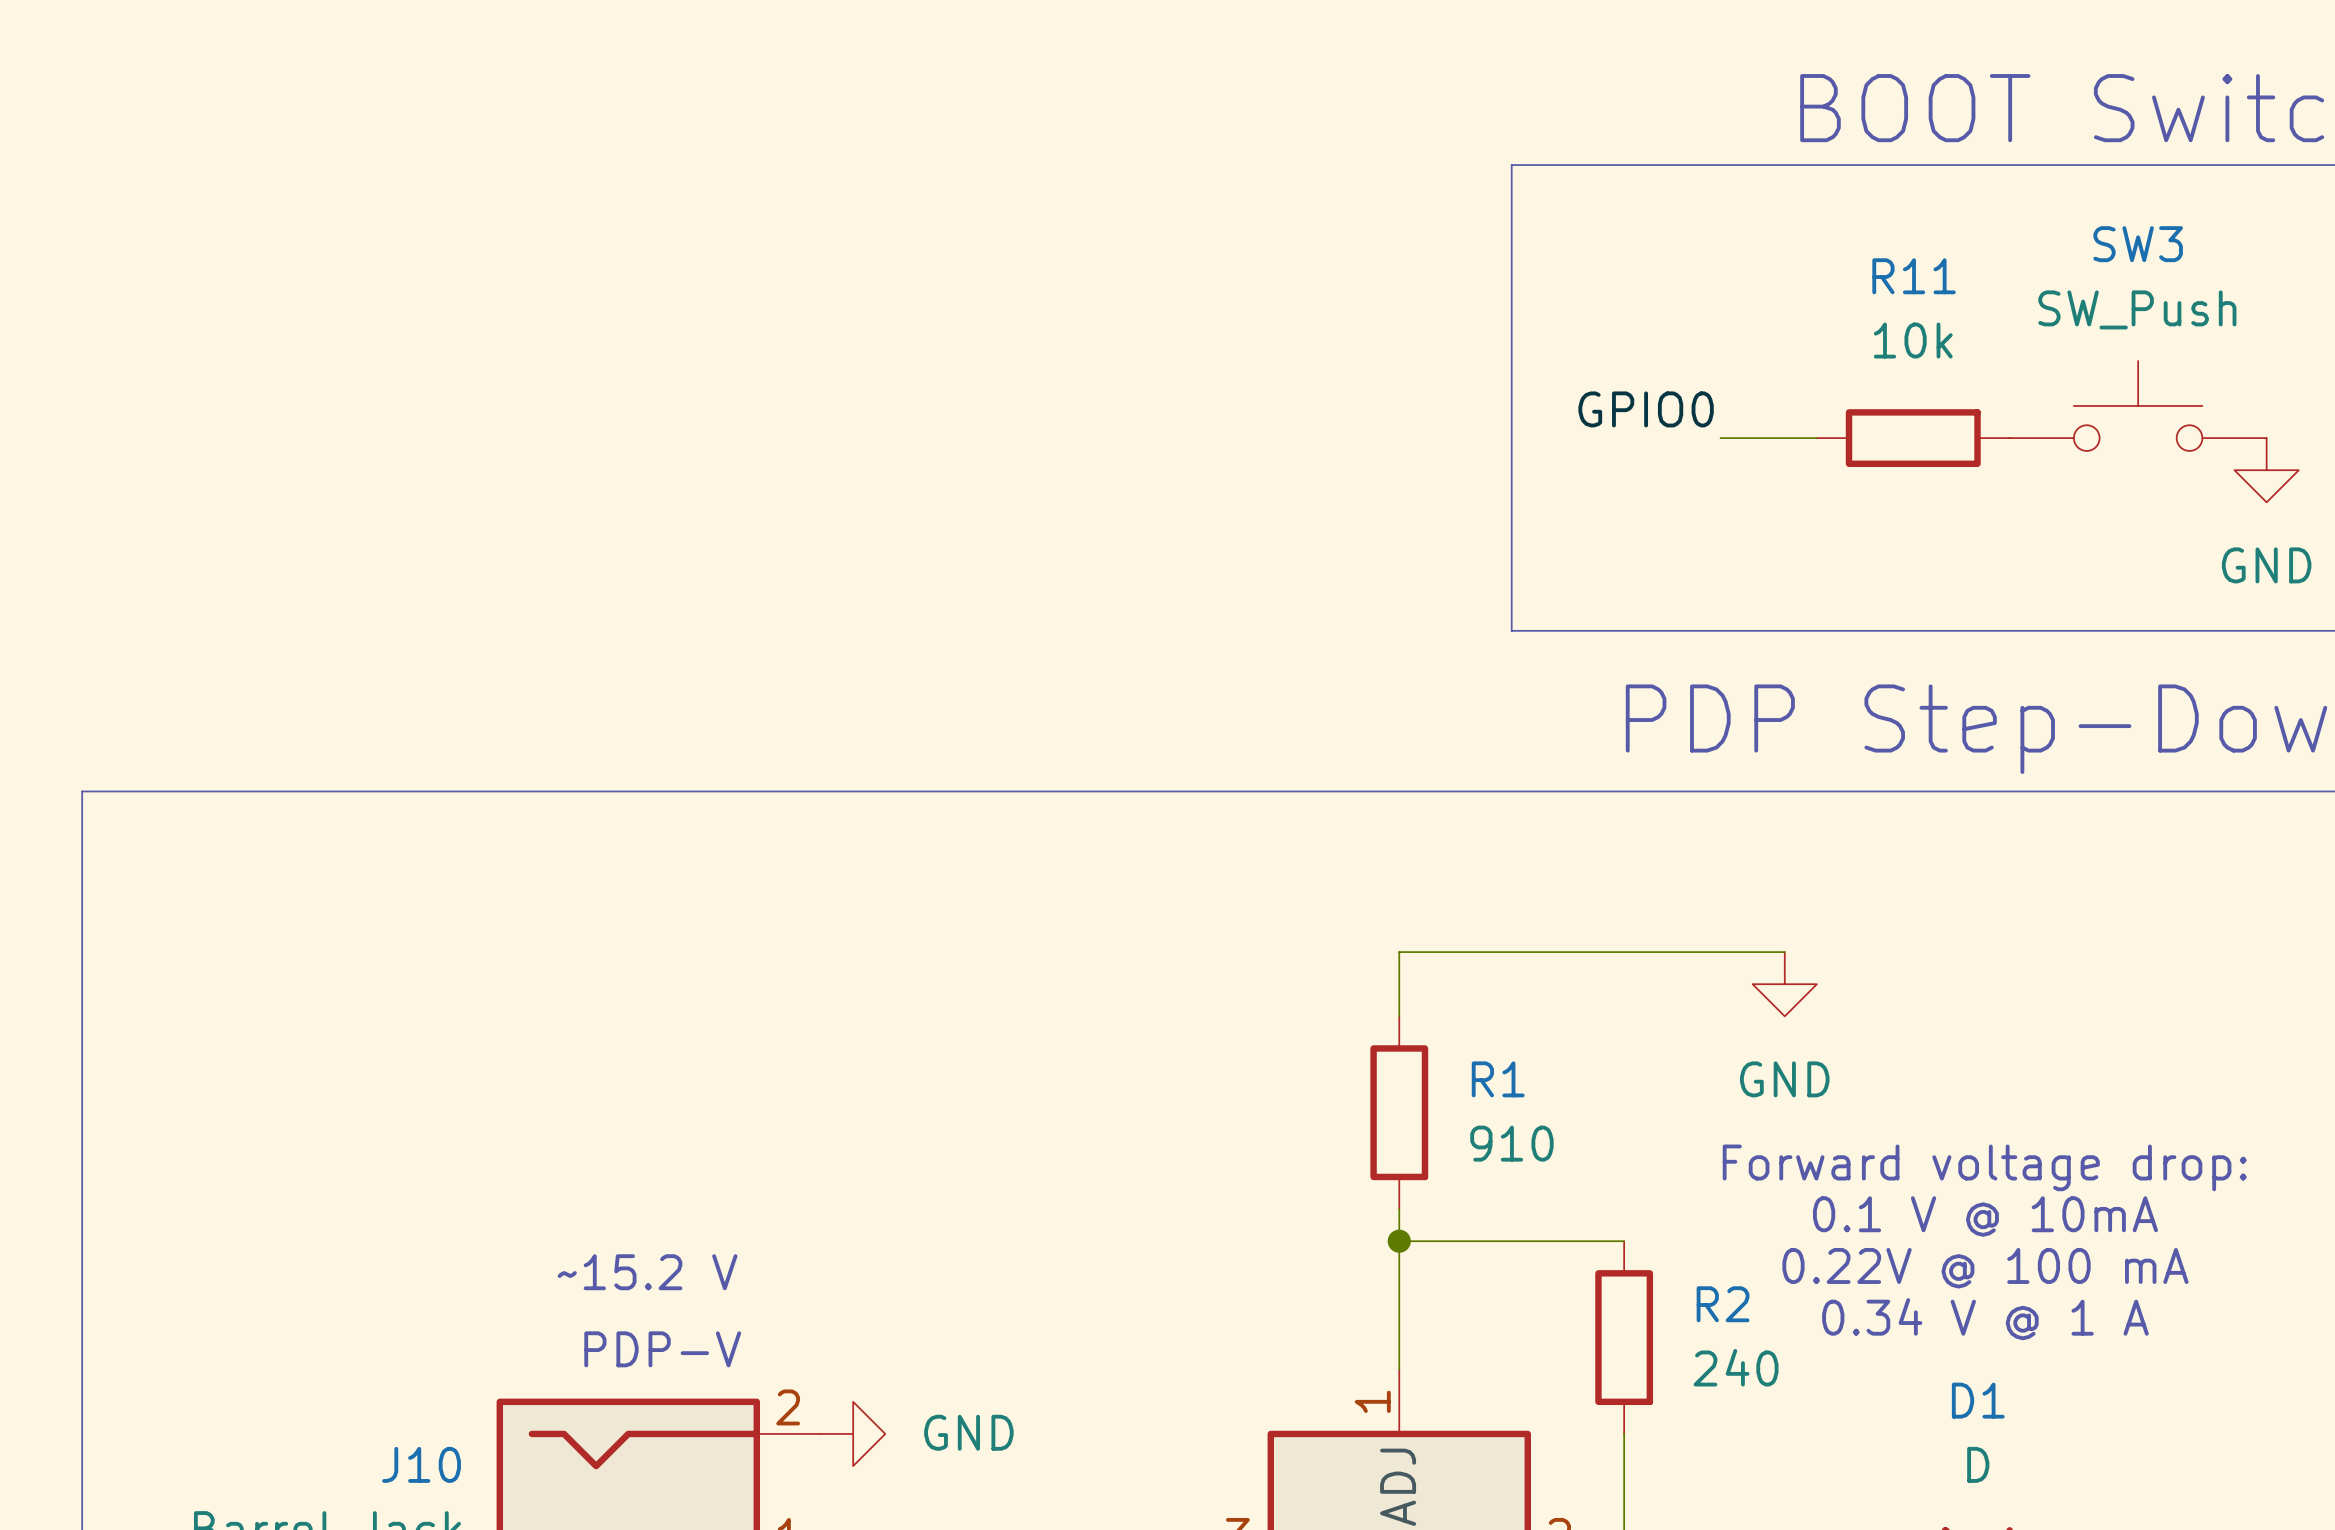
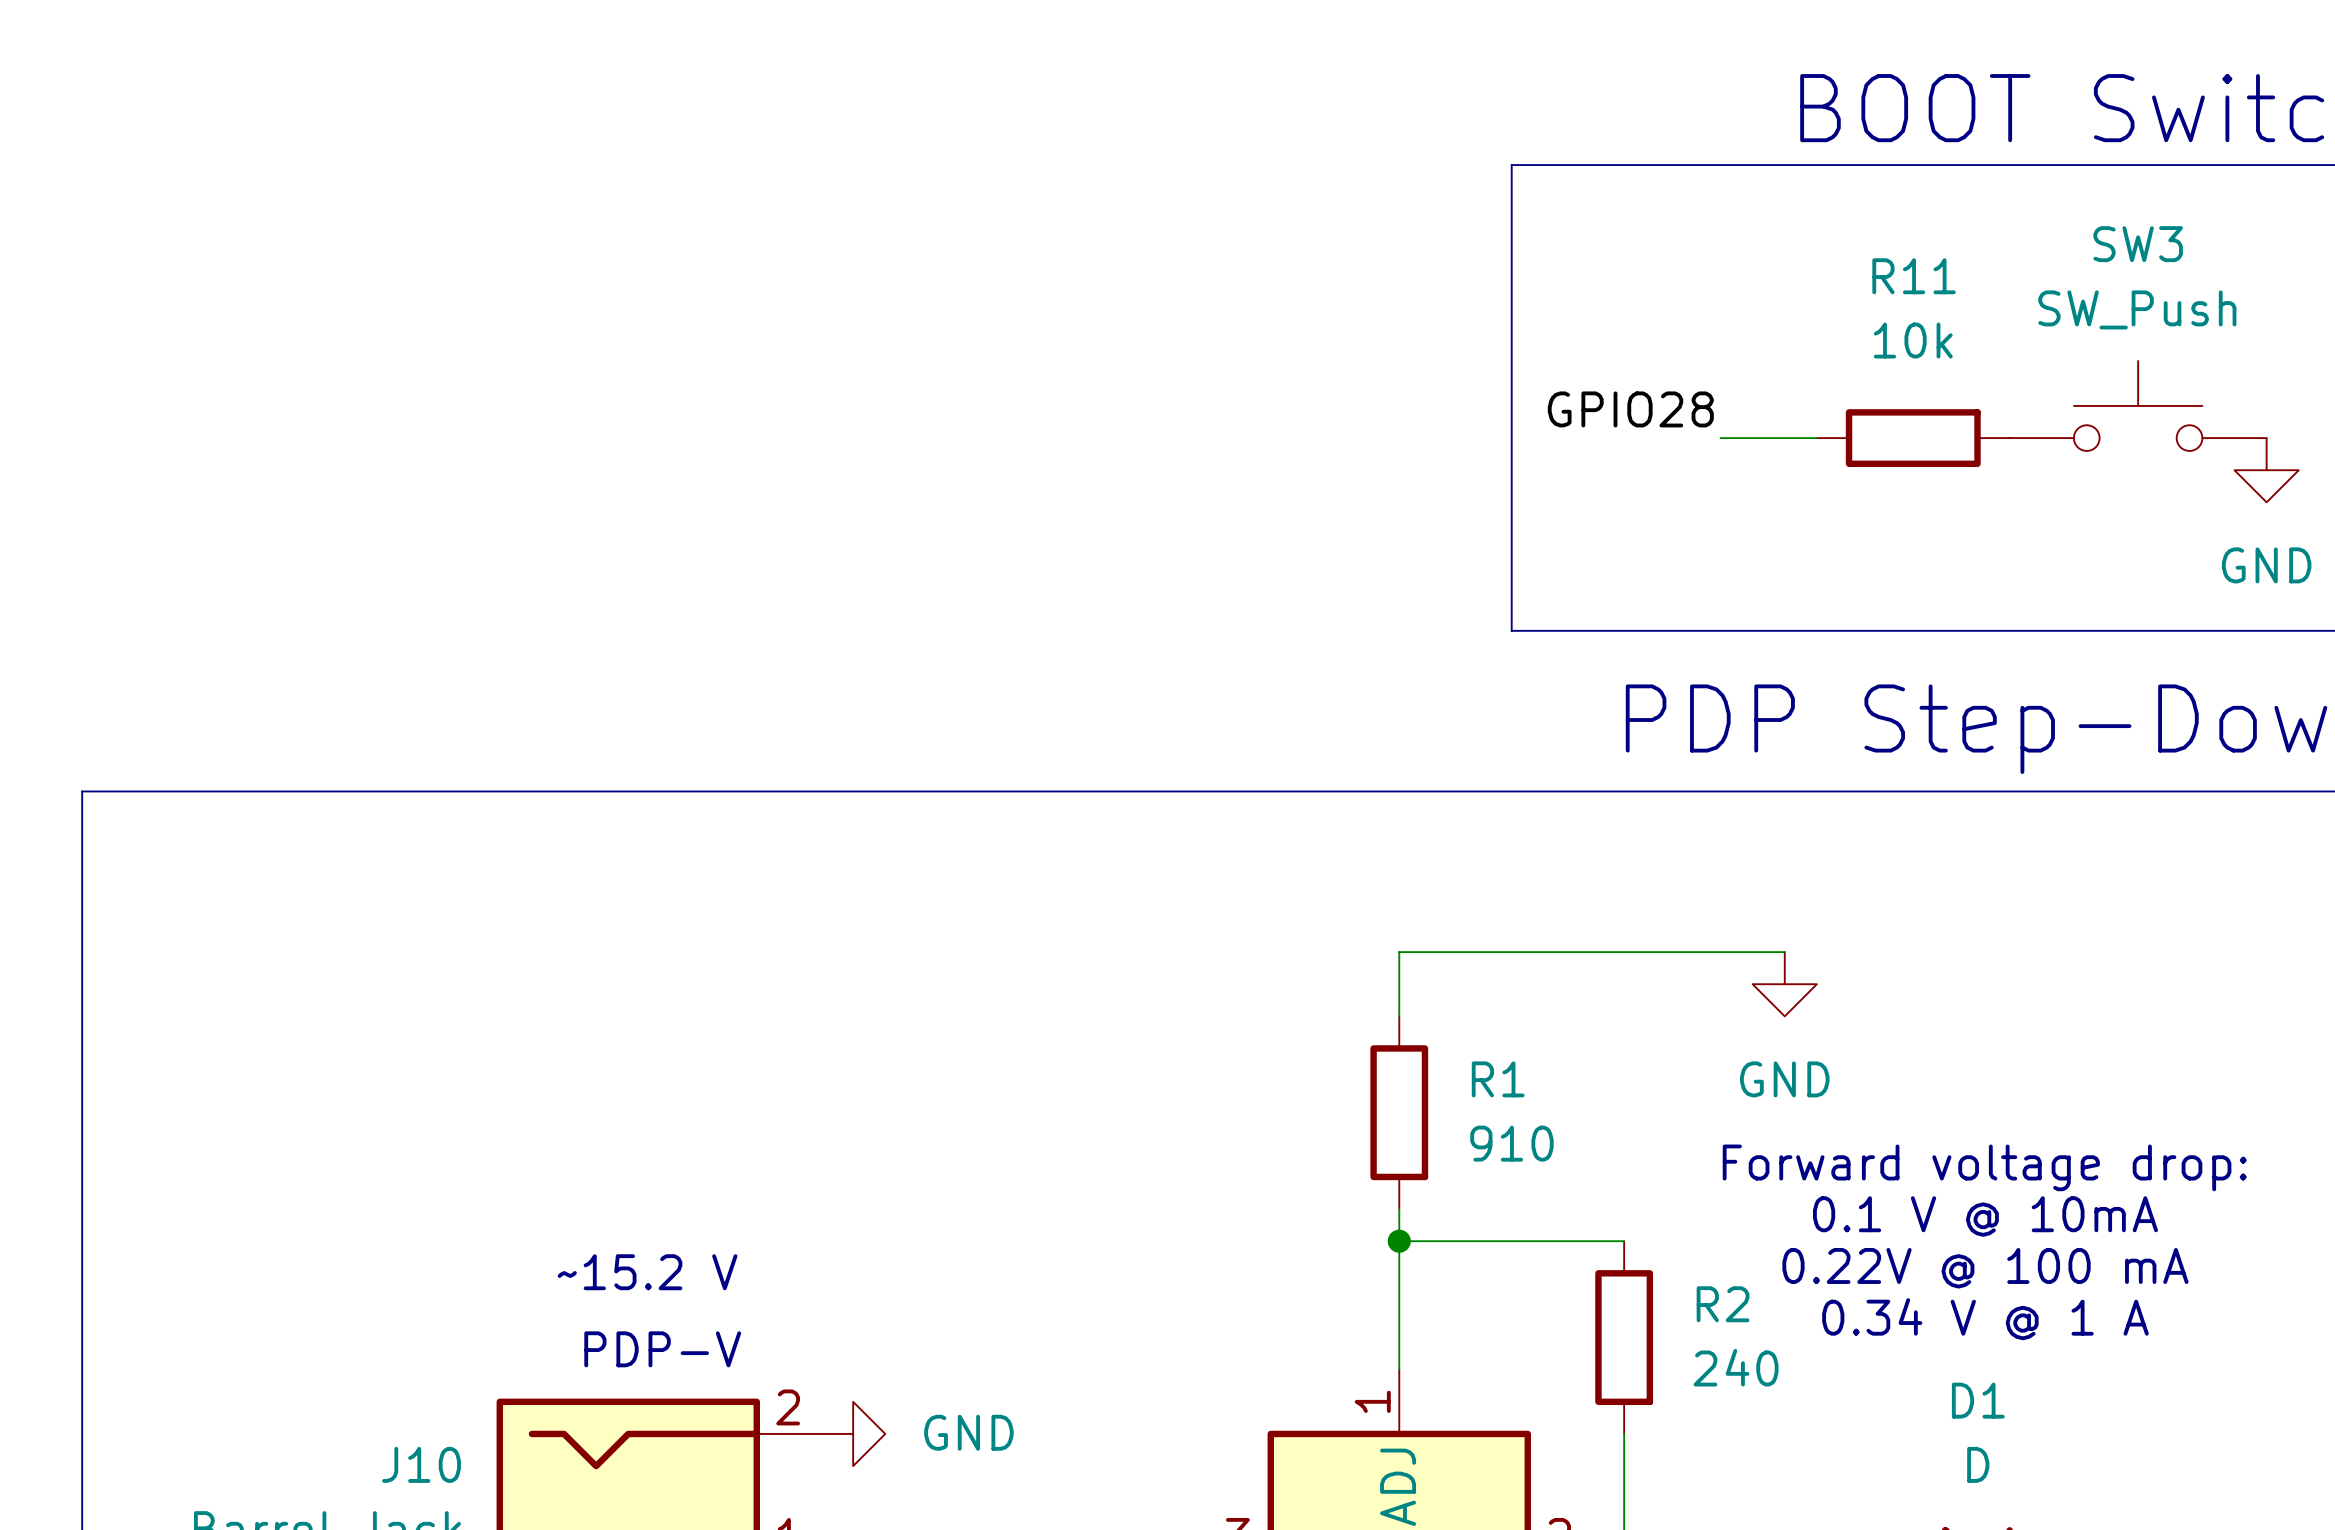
label: GPIO0 (1646, 409) -> GPIO28 (1630, 409)

